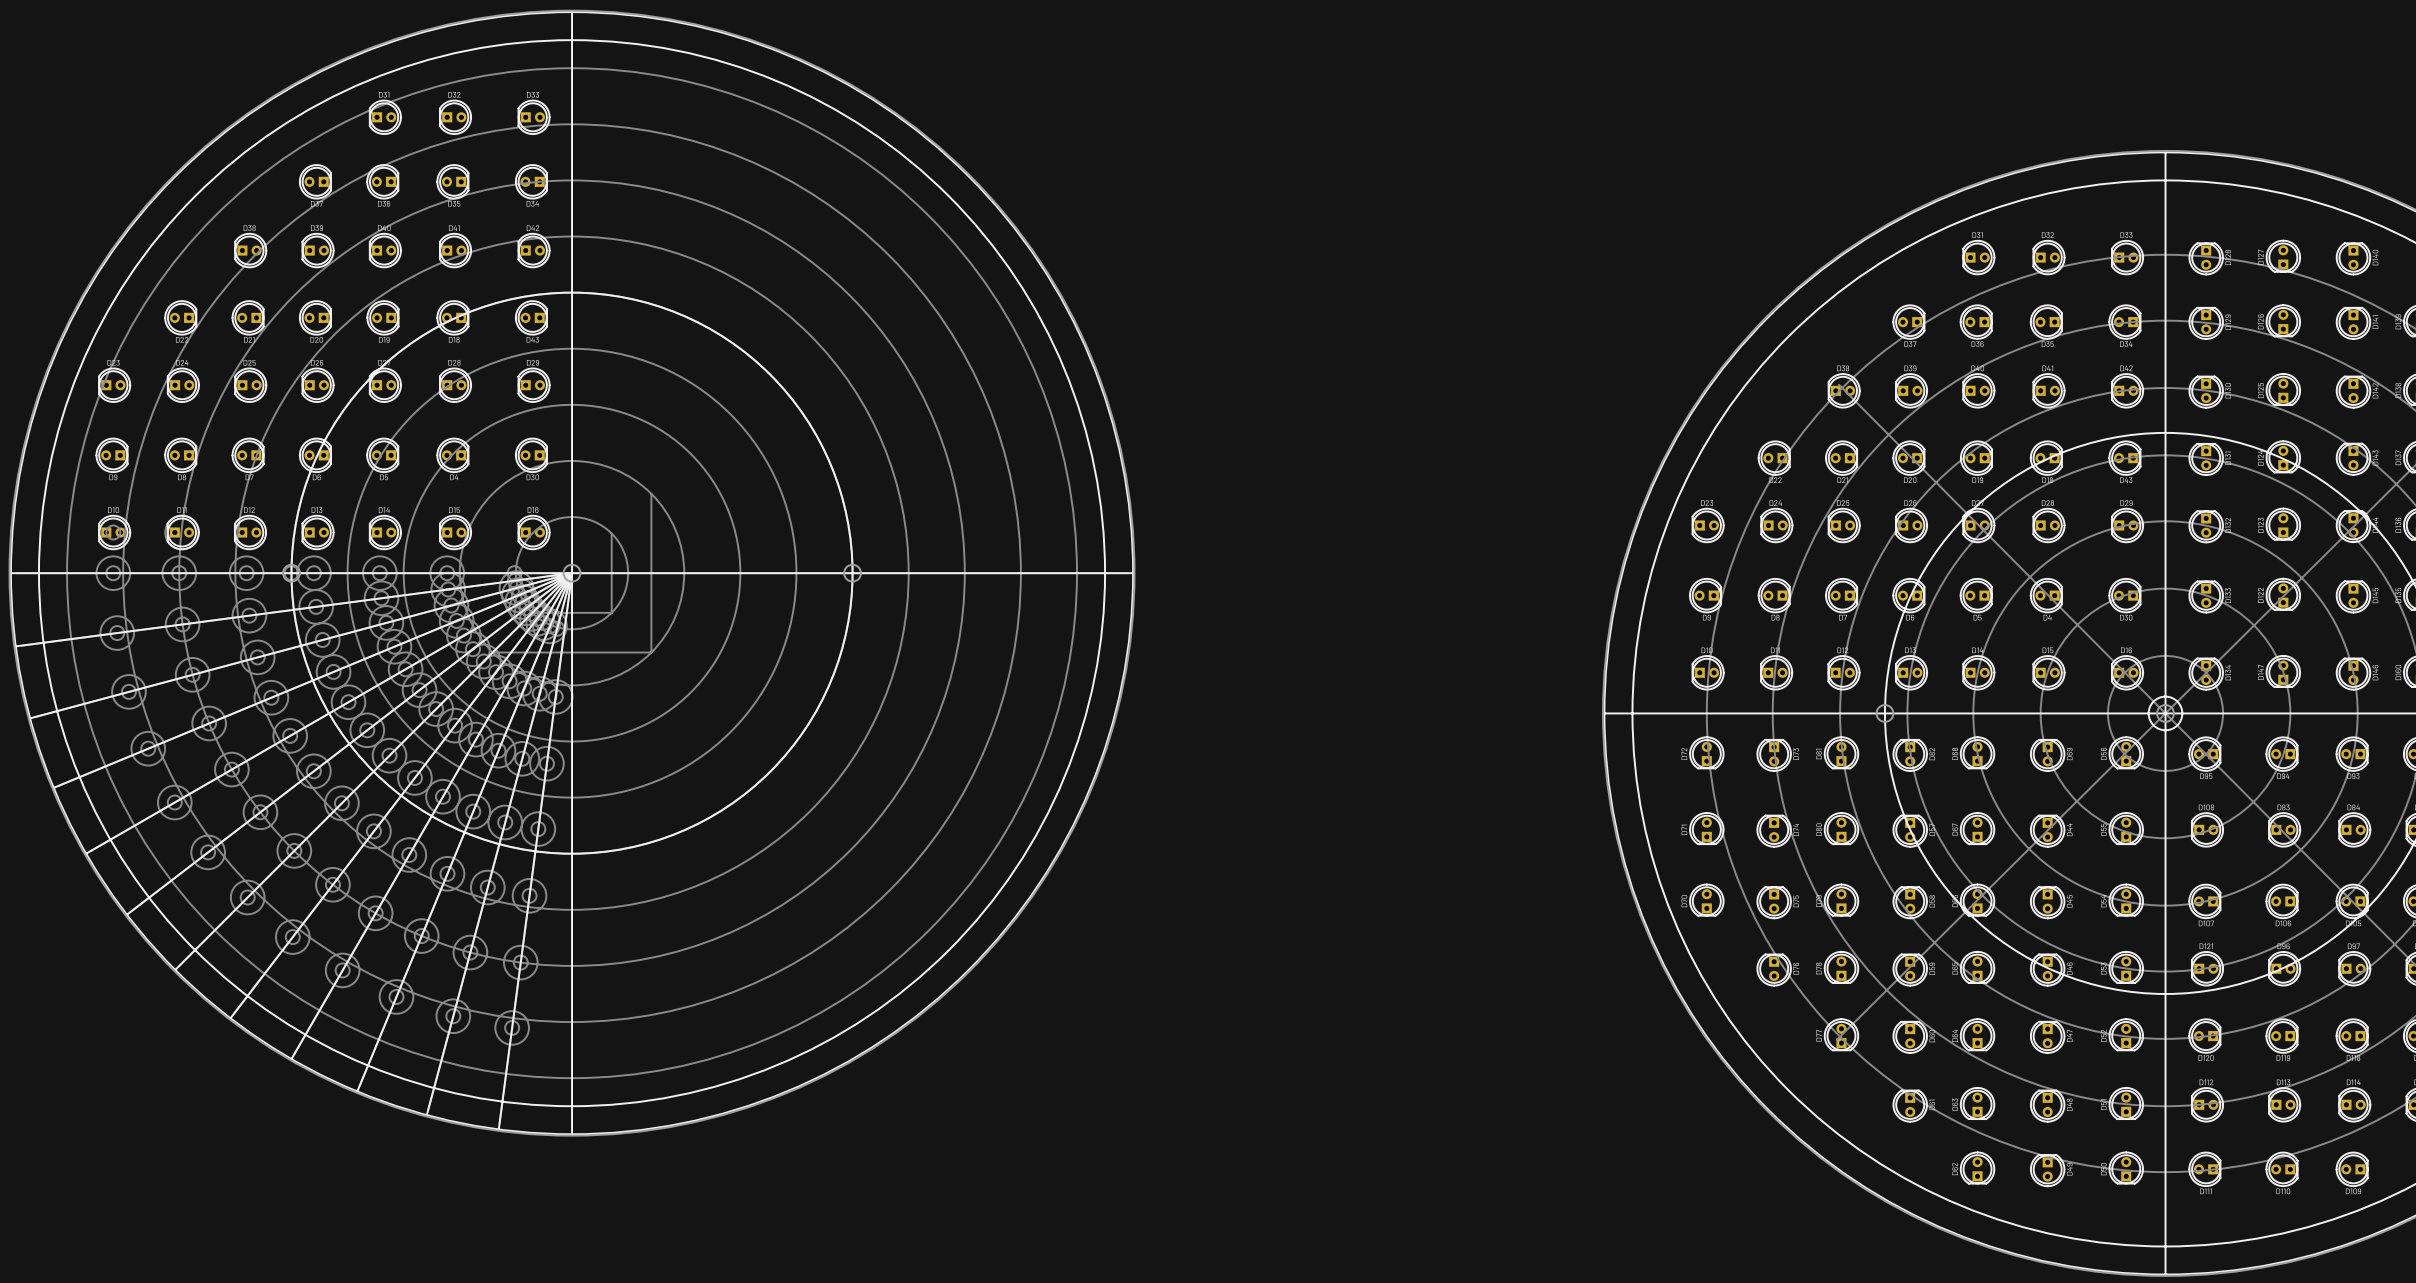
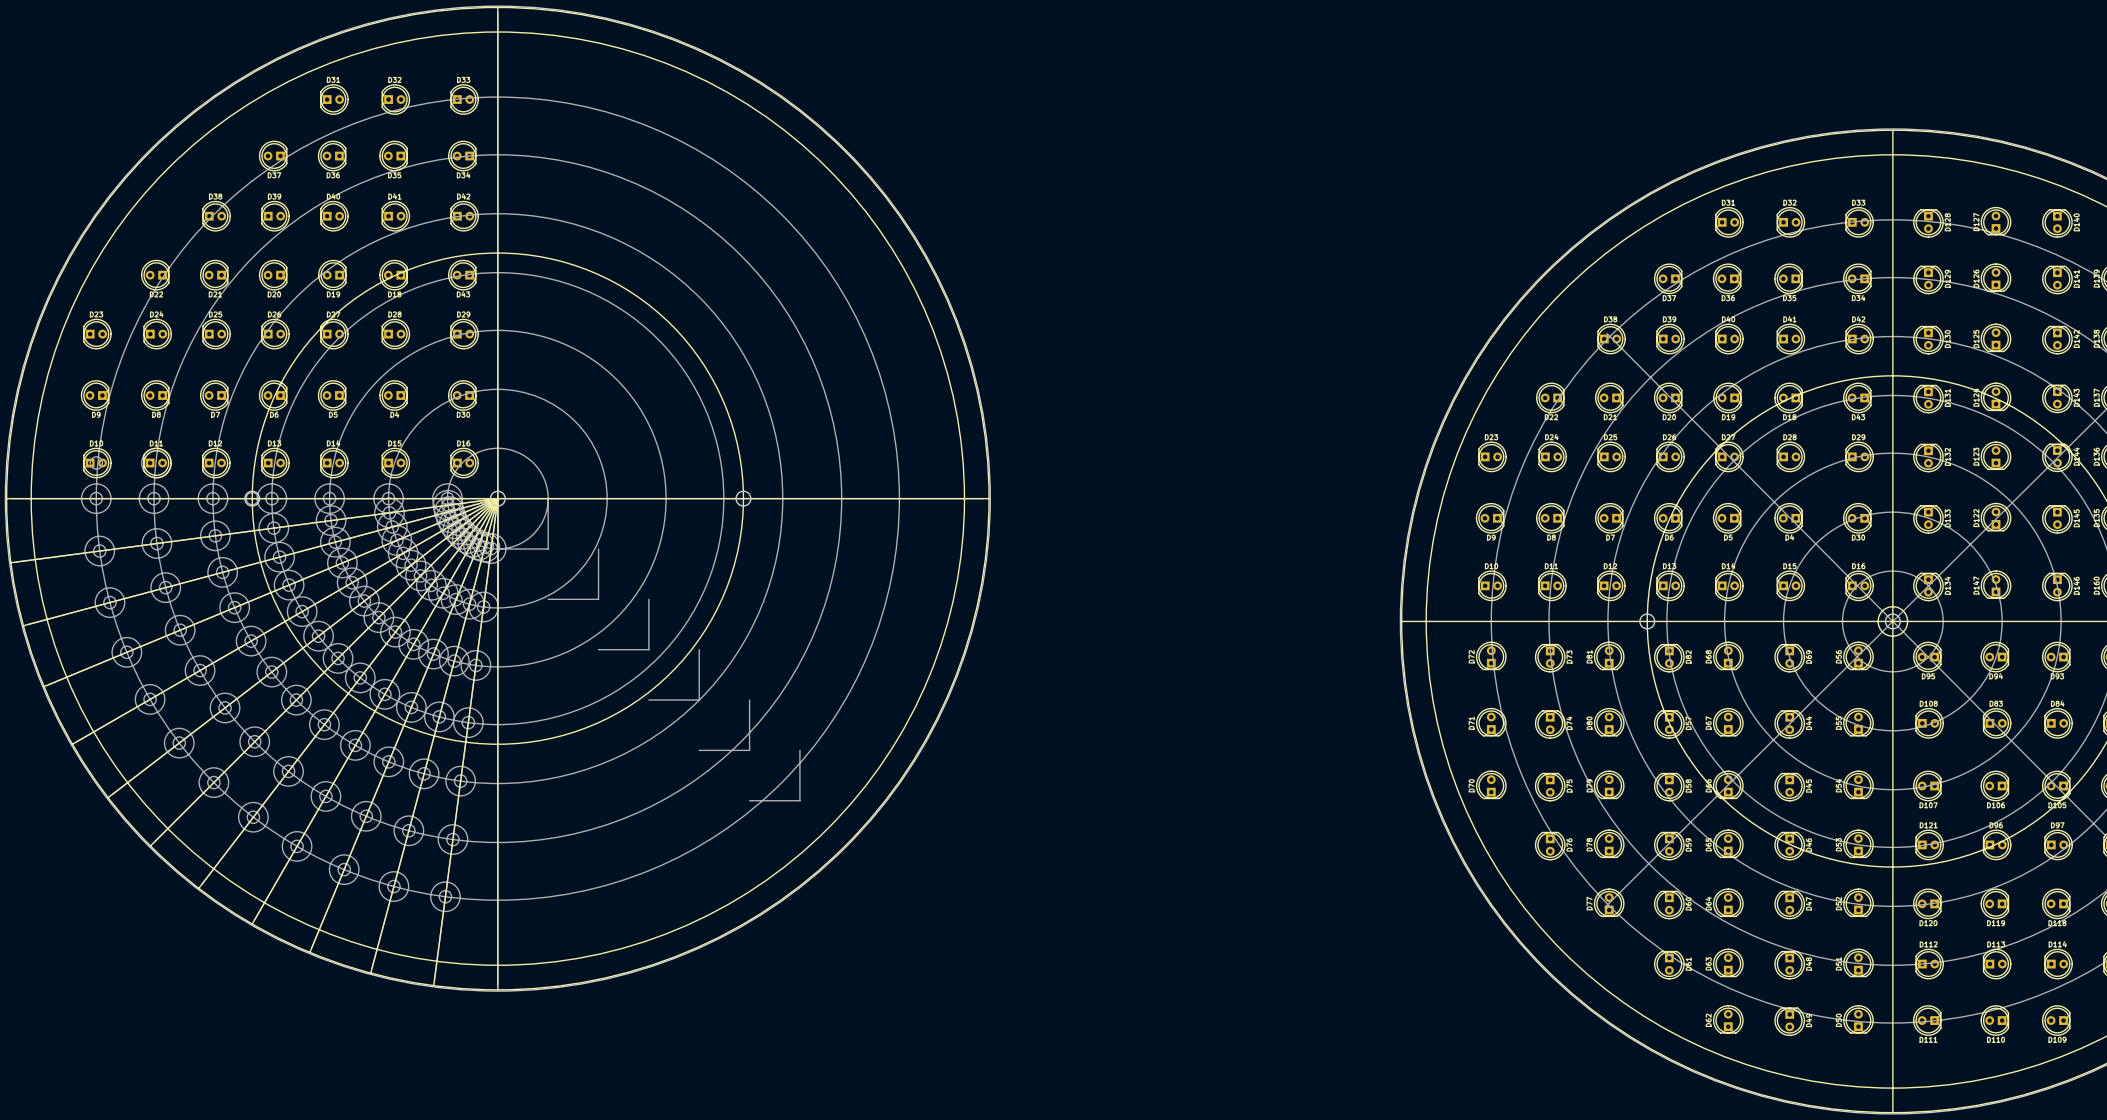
drawing: [66, 67, 1078, 1079] -> none
drawing: none -> [95, 96, 900, 901]
line: (651, 493) (651, 652) (492, 652) -> none
line: (611, 533) (611, 612) (532, 612) -> none
line: none -> (548, 498) (548, 548) (497, 548)
line: none -> (598, 548) (598, 599) (548, 599)
line: none -> (648, 599) (648, 649) (598, 649)
line: none -> (699, 649) (699, 700) (648, 700)
line: none -> (749, 700) (749, 750) (699, 750)
line: none -> (799, 750) (799, 800) (749, 800)

